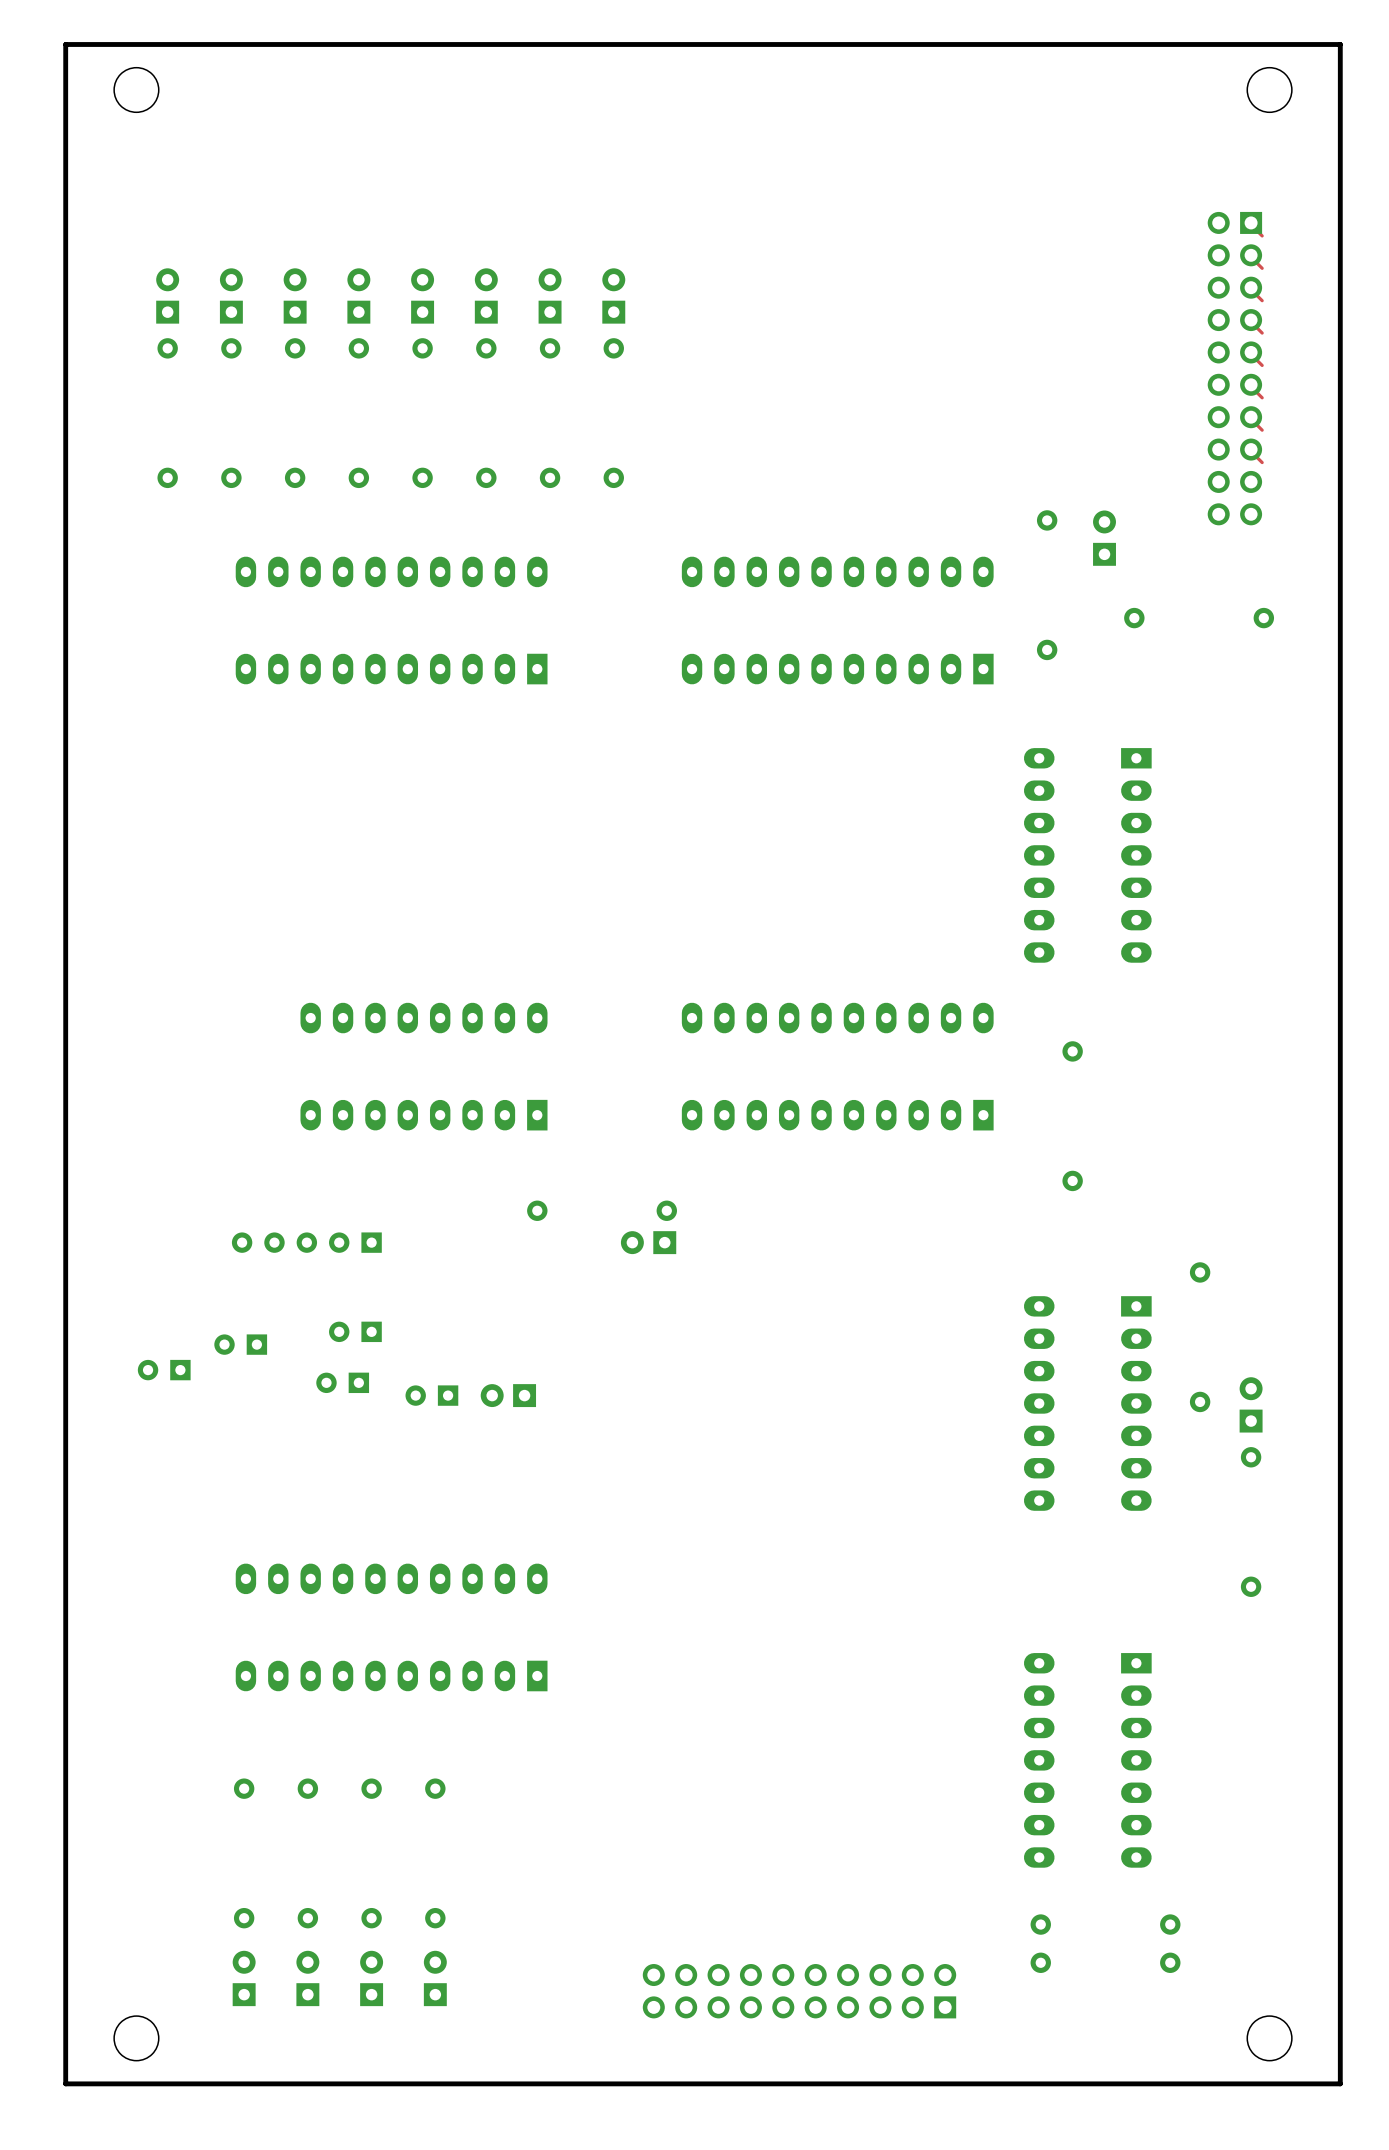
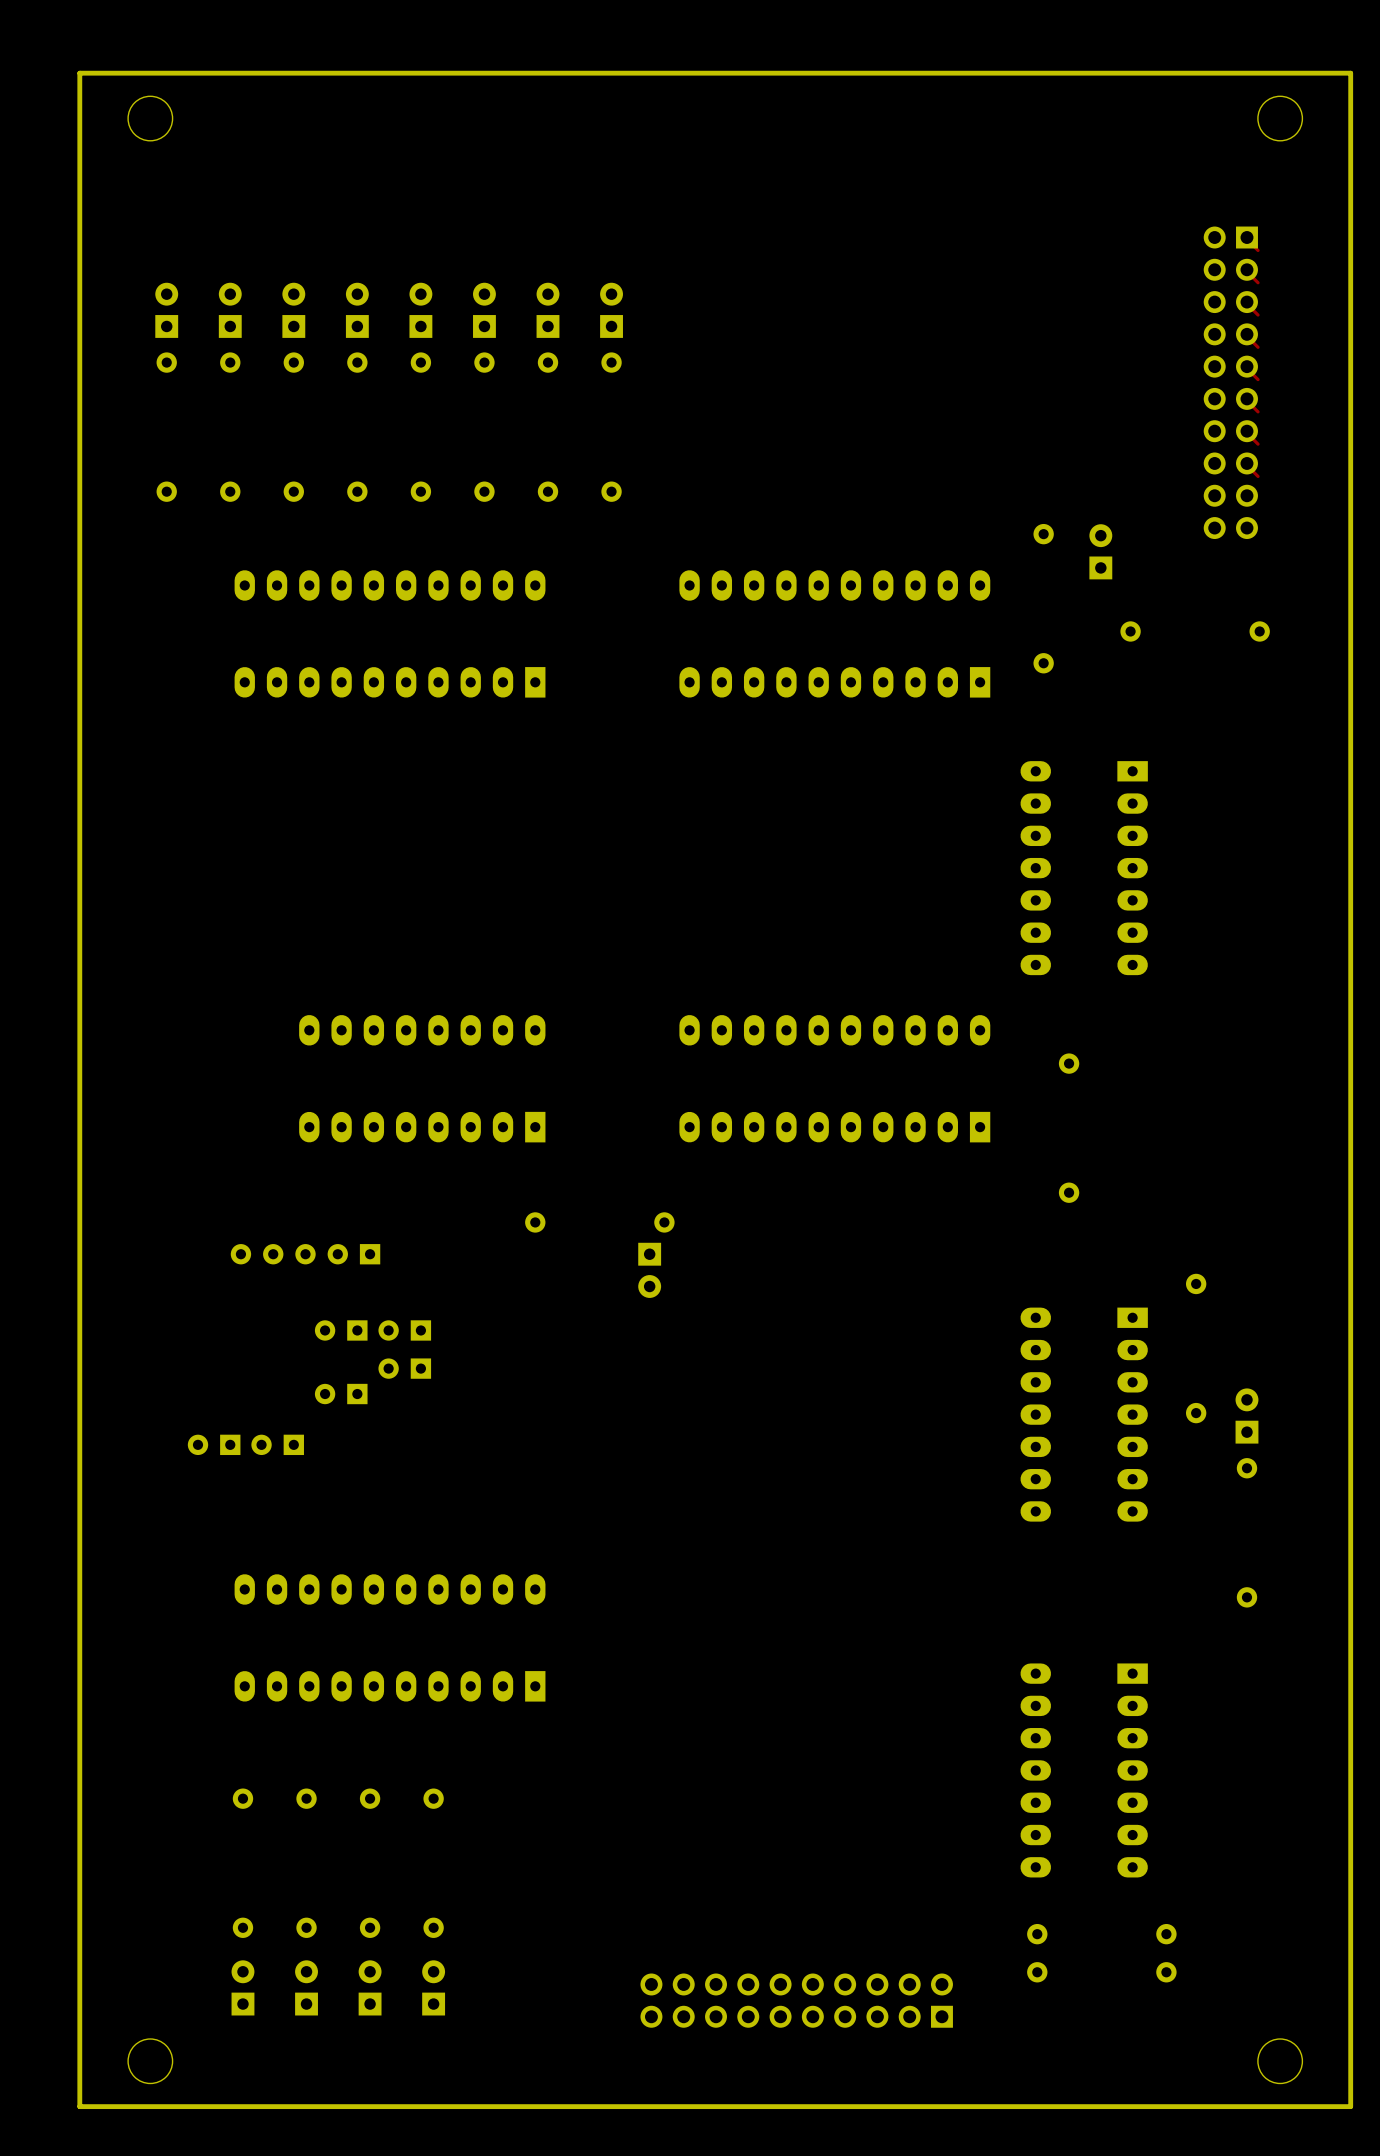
part position: (703, 1064) -> (715, 1089)
part rotation: 0° (648, 1242) -> 90° counterclockwise (649, 1270)
part: none -> (404, 1330)
part position: (355, 1331) -> (341, 1330)
part: (240, 1344) -> none
part: none -> (404, 1368)
part: (164, 1370) -> none
part: (431, 1395) -> none
part: (508, 1395) -> none
part: none -> (214, 1444)
part: none -> (277, 1444)

